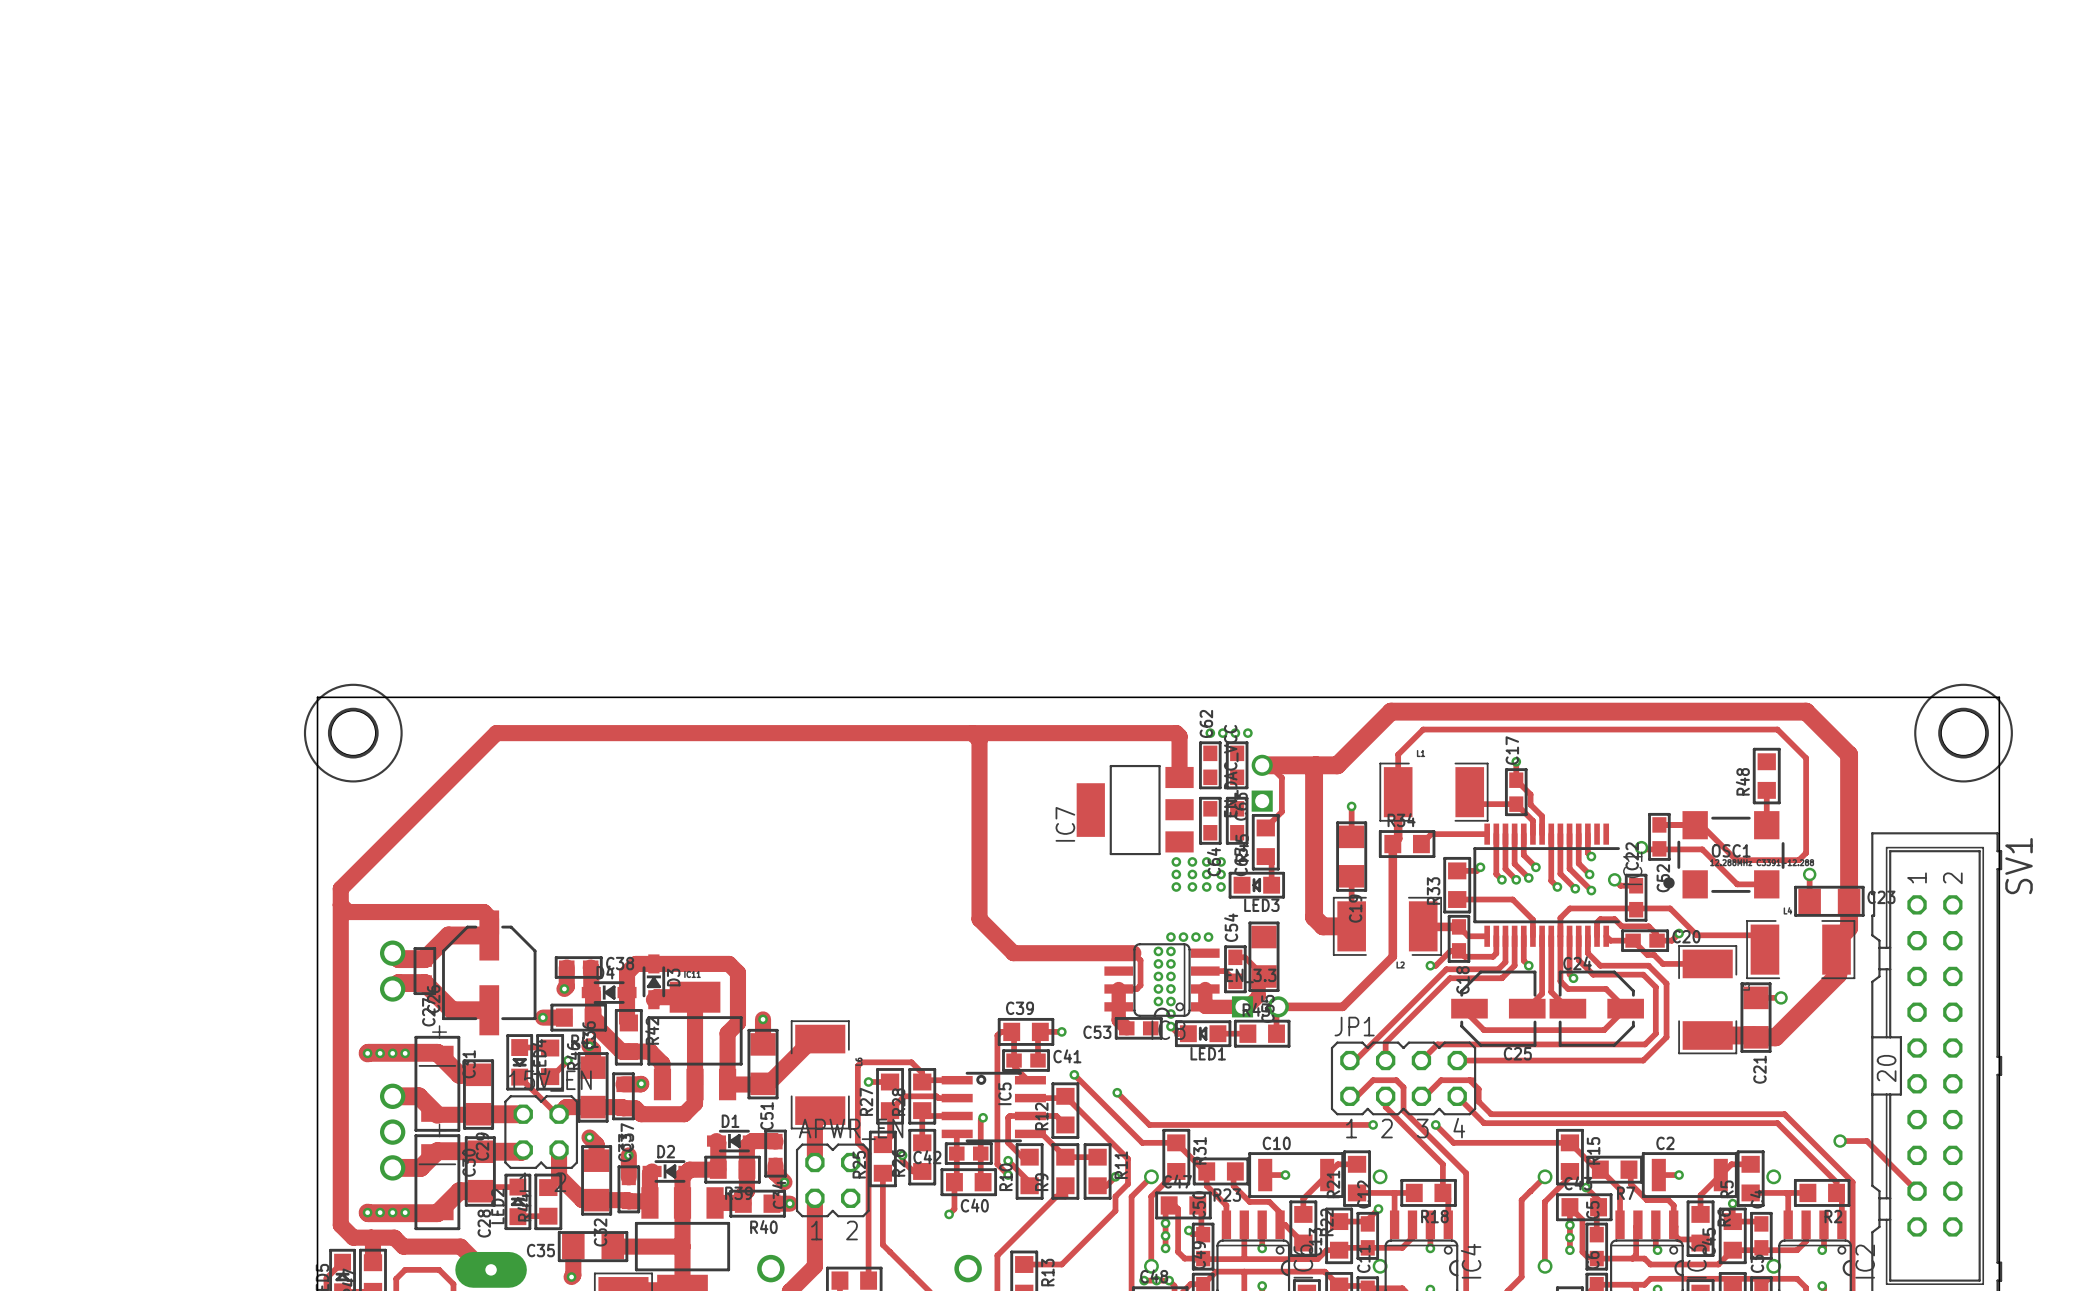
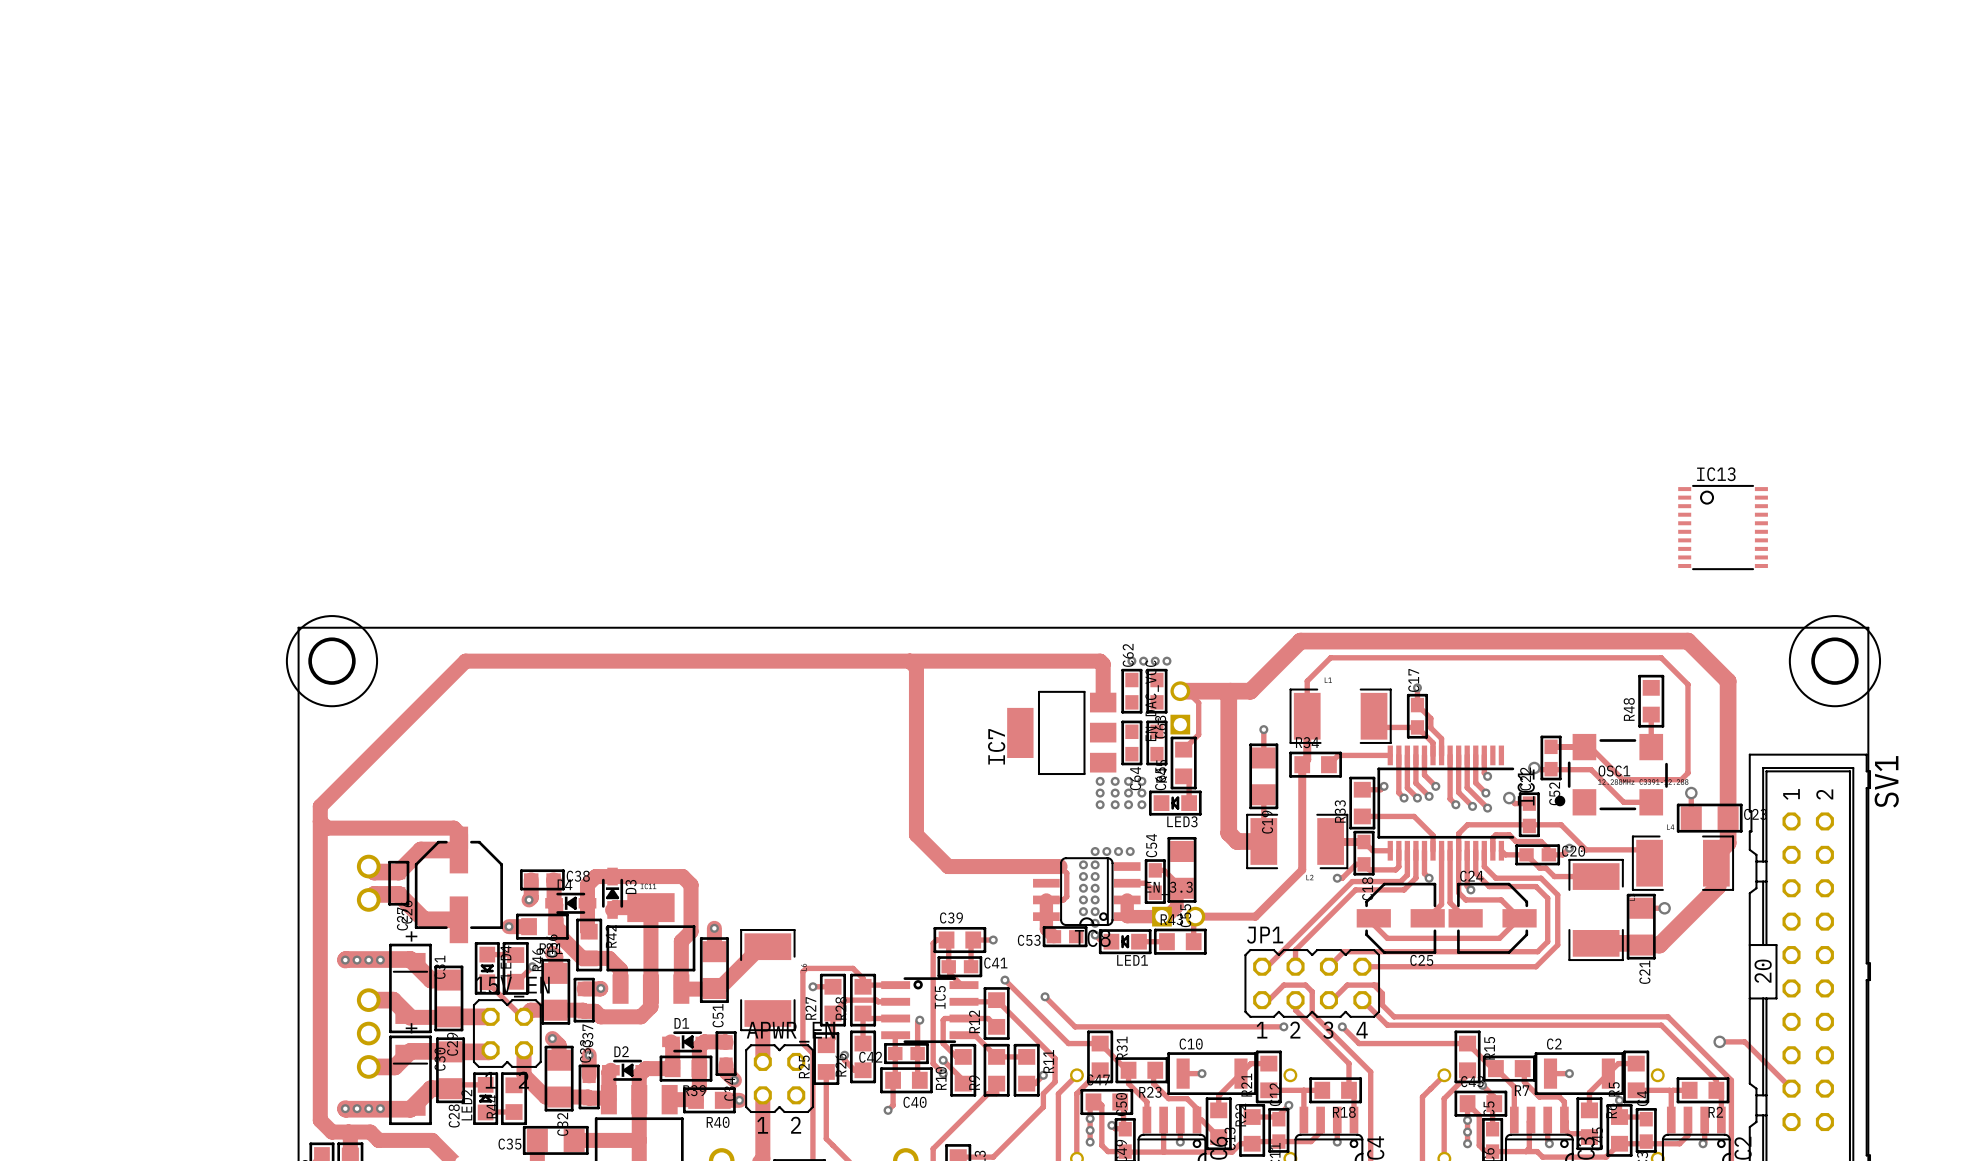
IC13: none -> (1723, 527)

